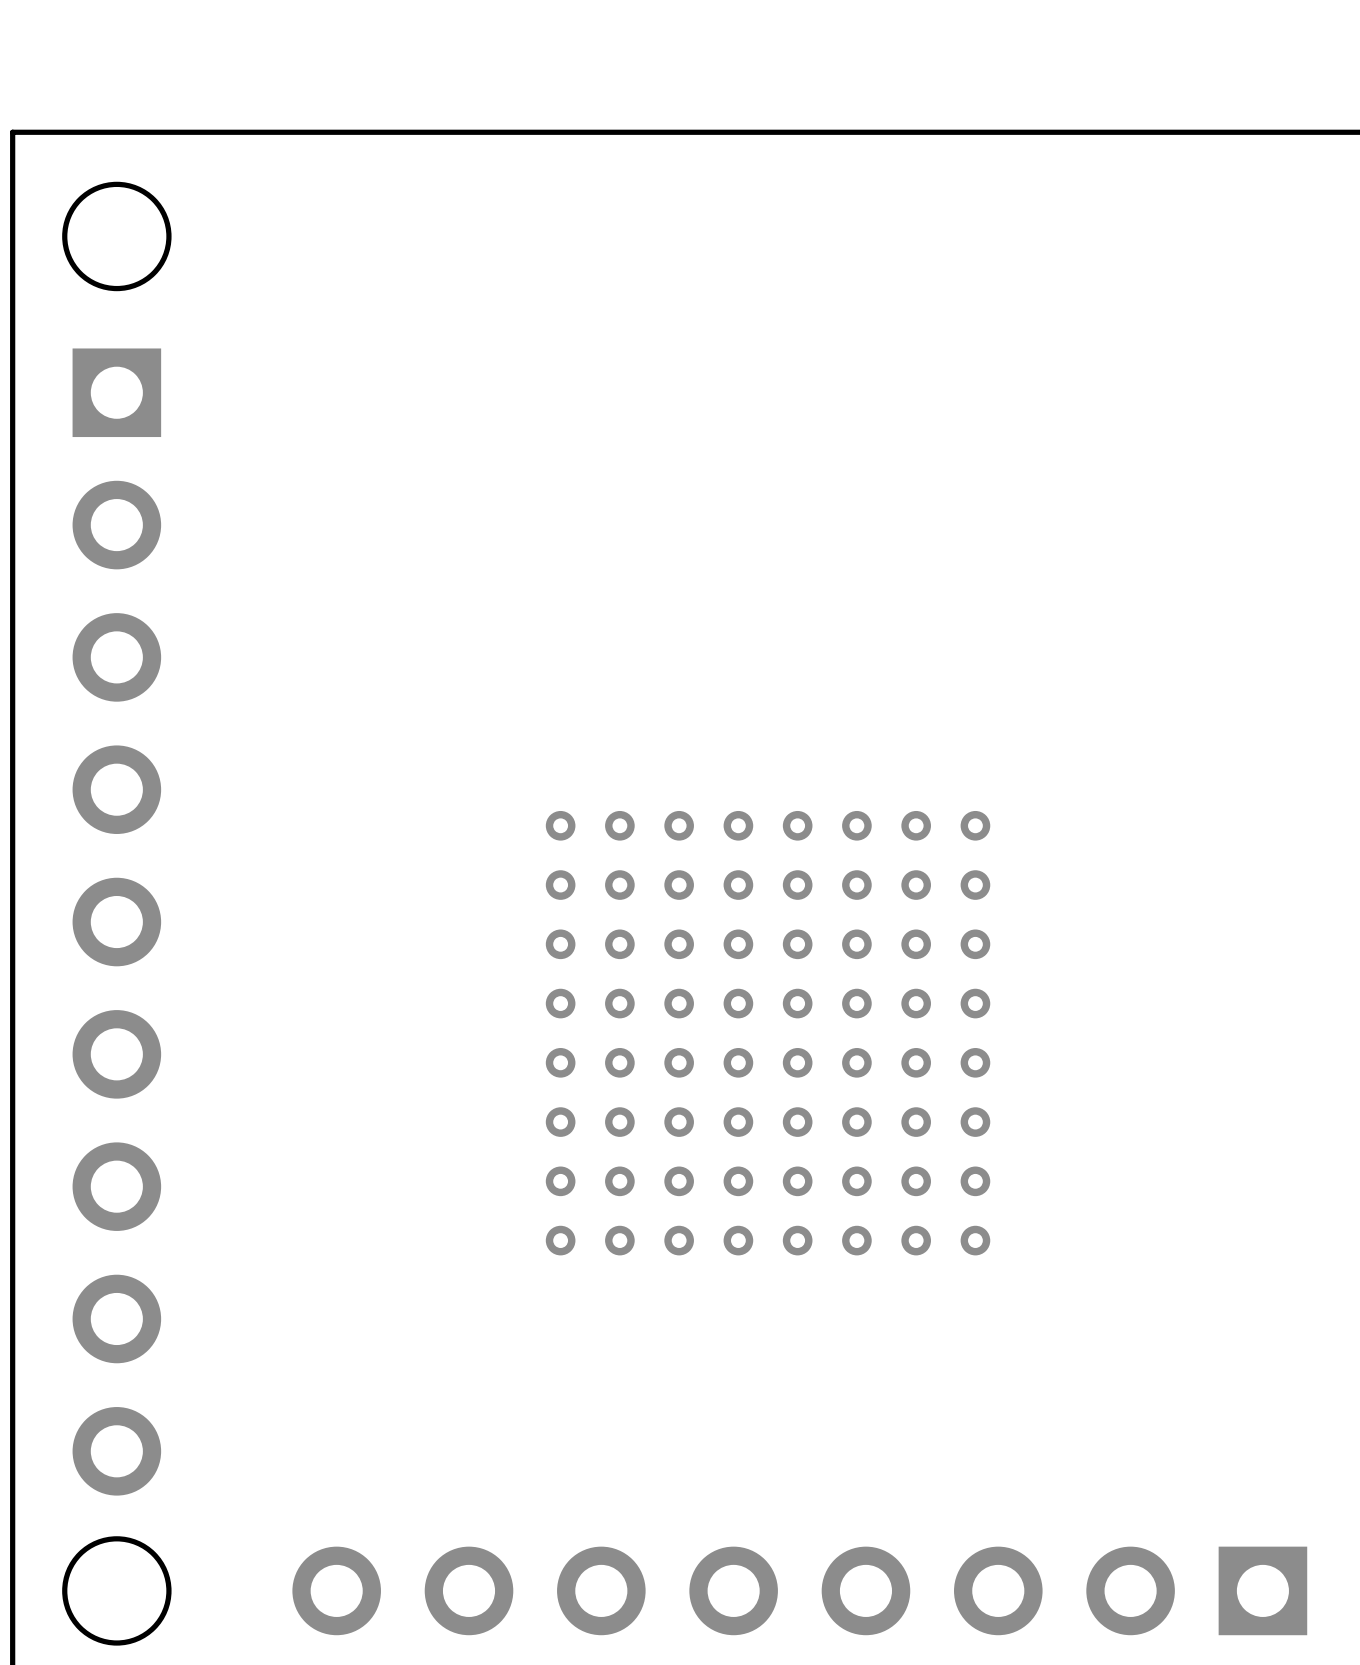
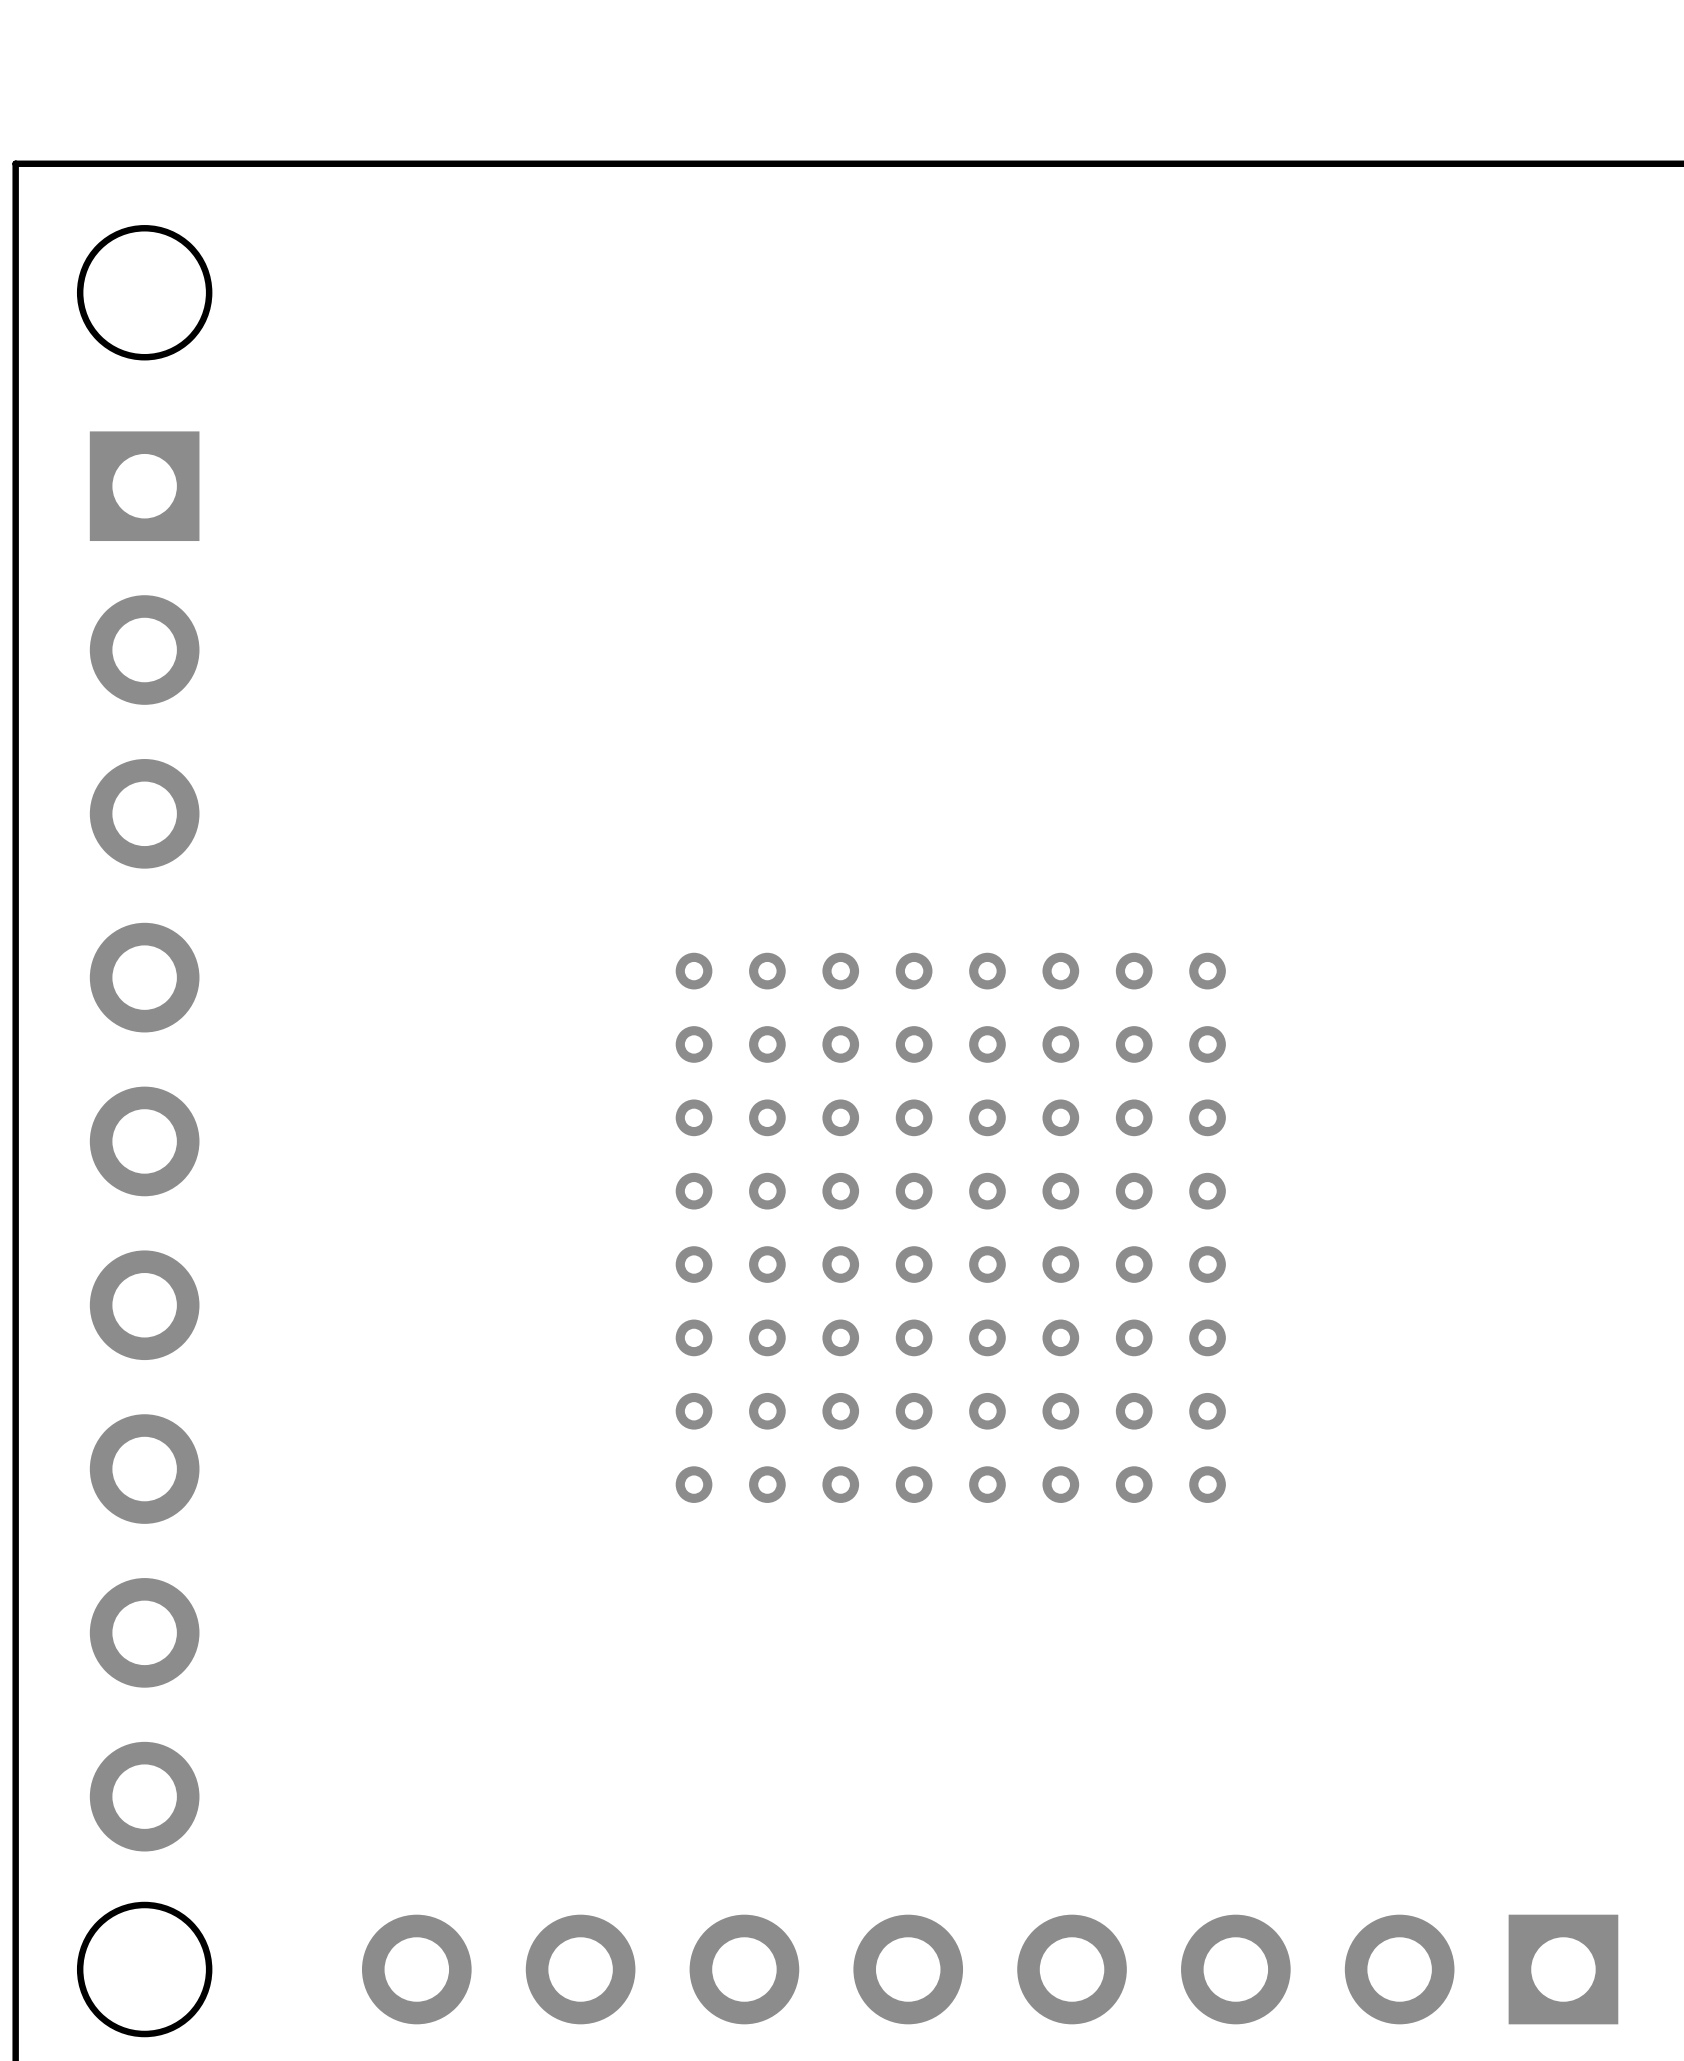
part position: (768, 1033) -> (950, 1227)

